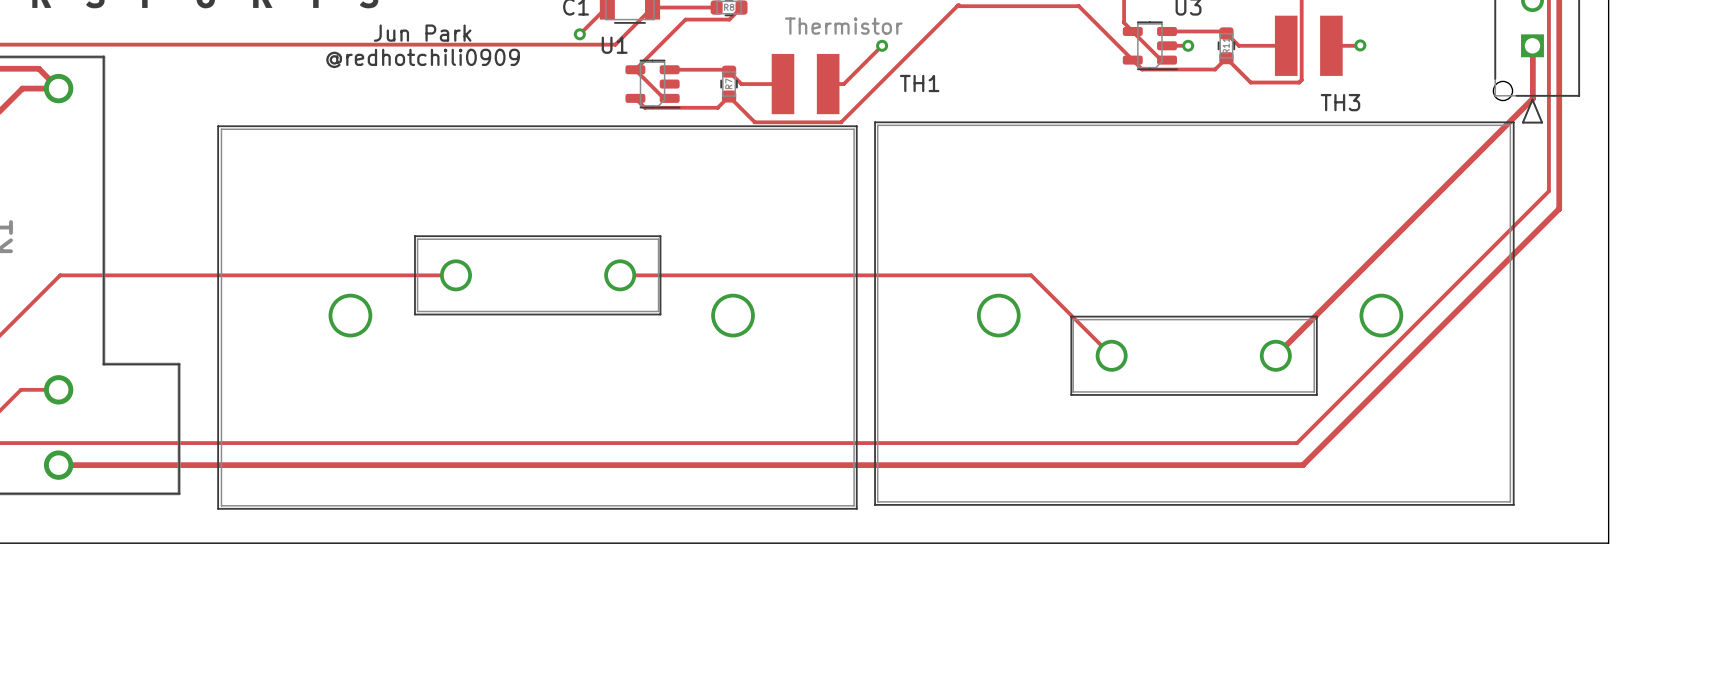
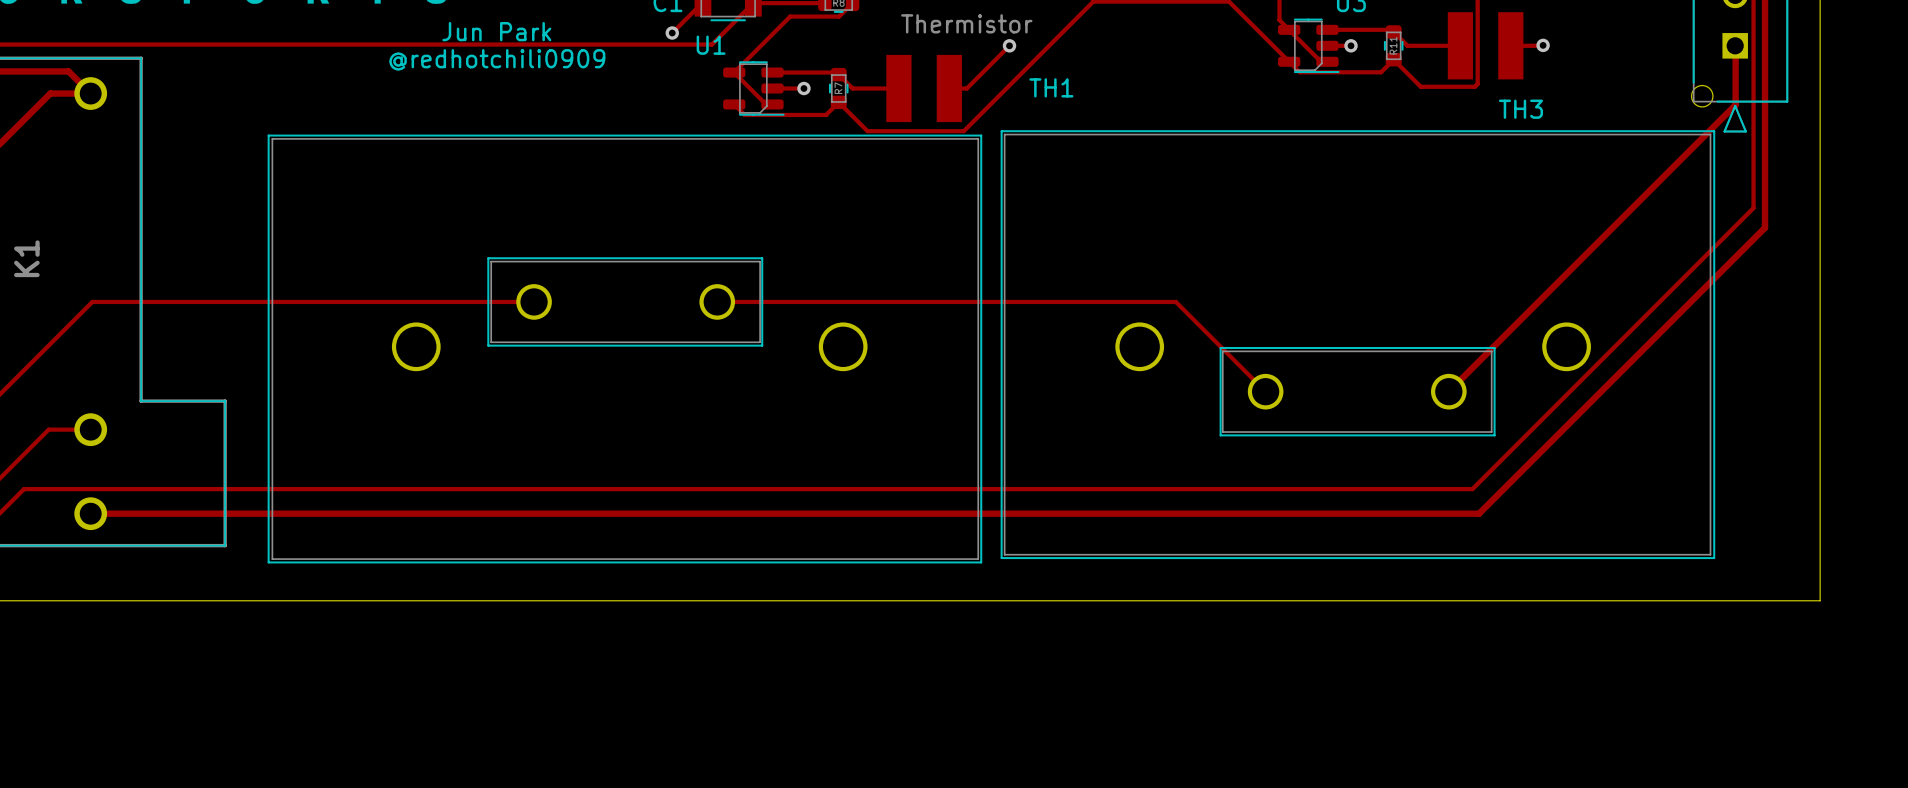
track: none -> (772, 88) (803, 88)
via: none -> (803, 88)

